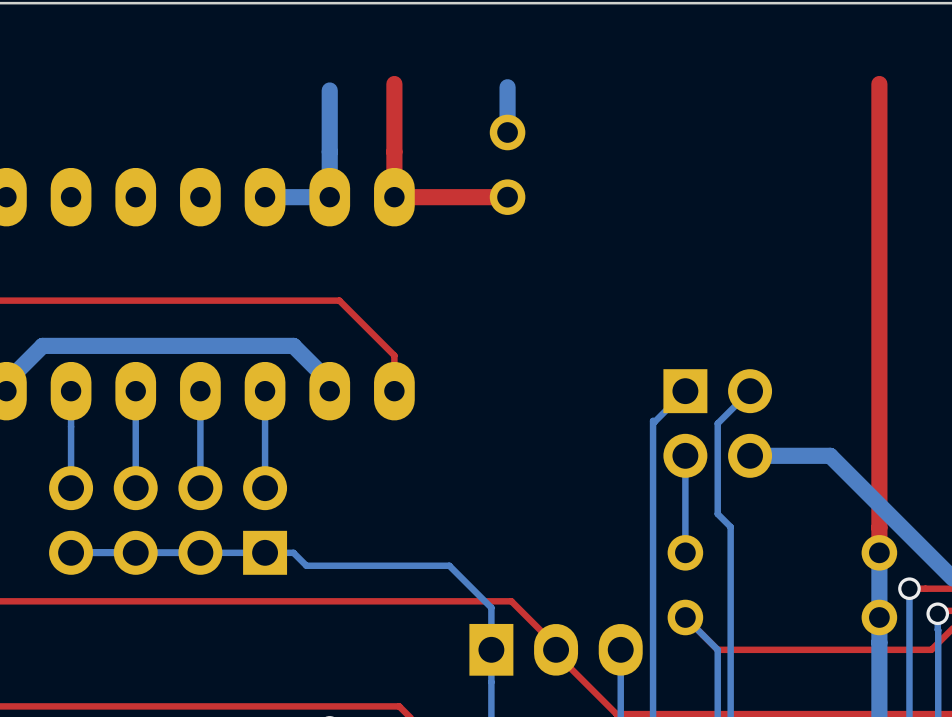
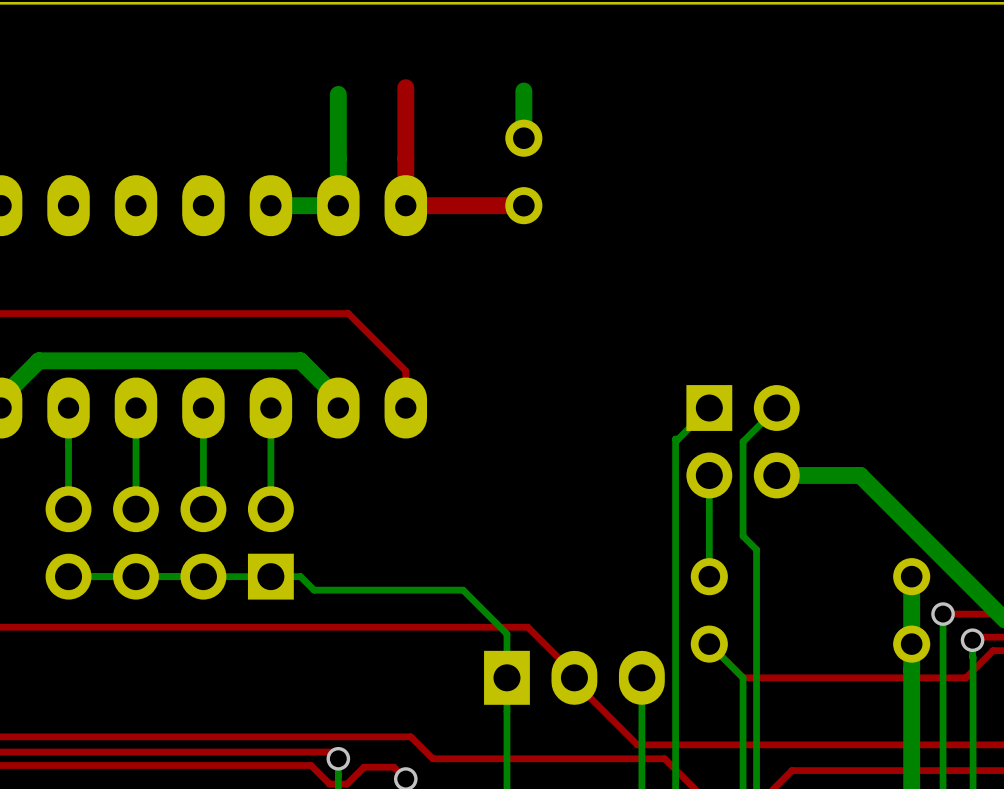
top track: (879, 83) (879, 552) -> none

